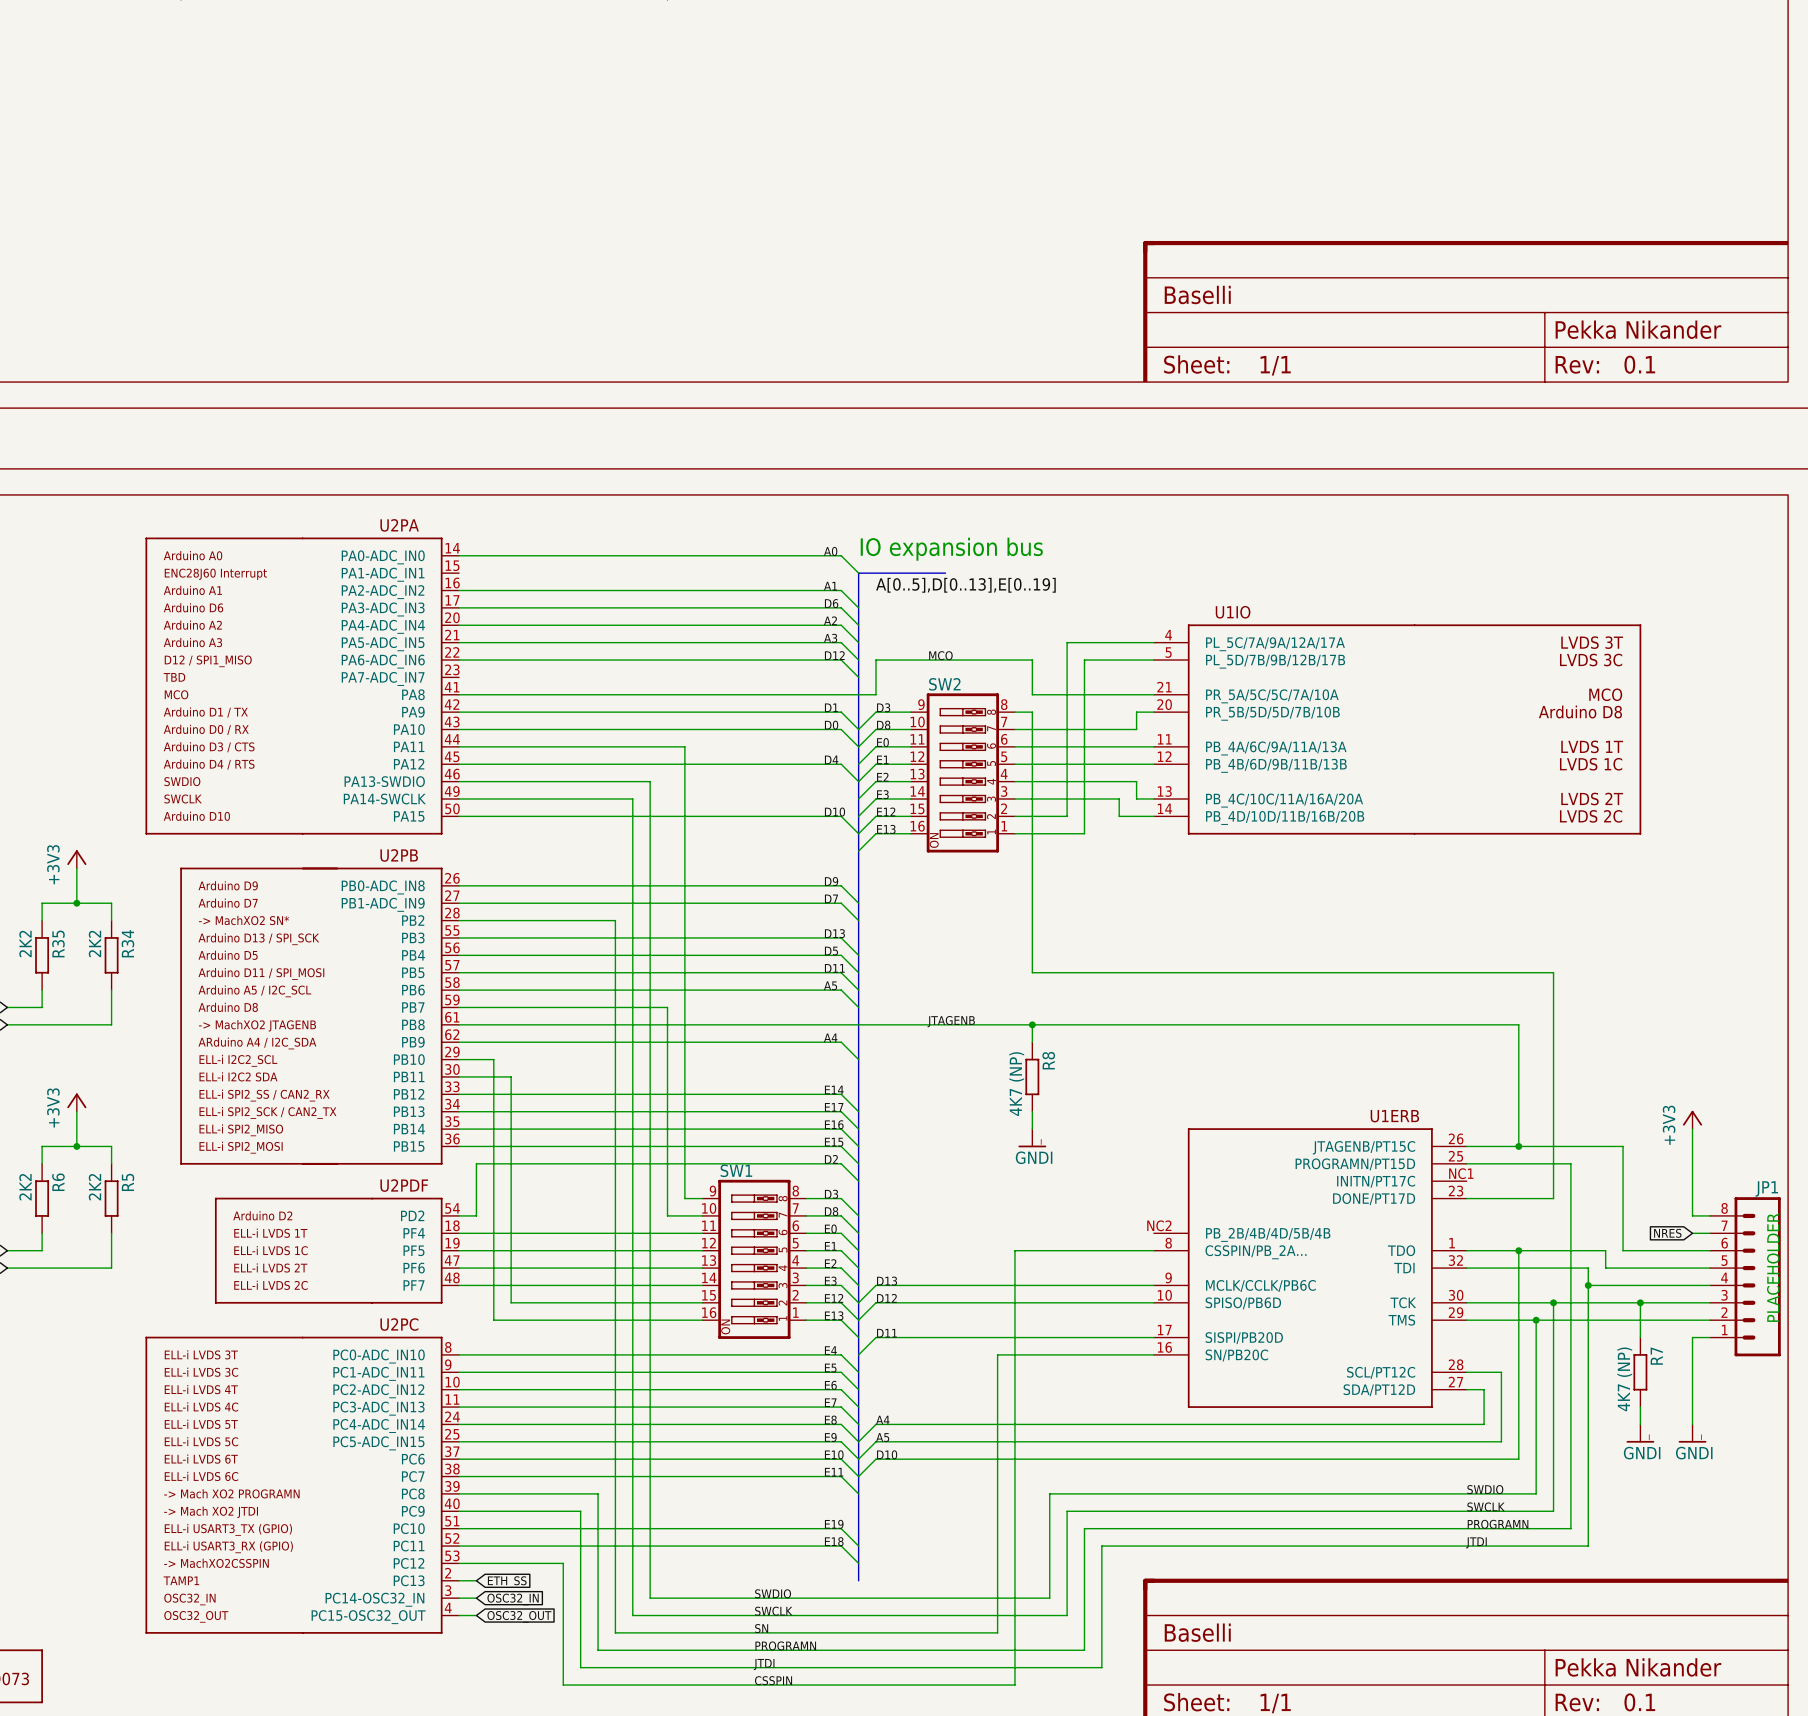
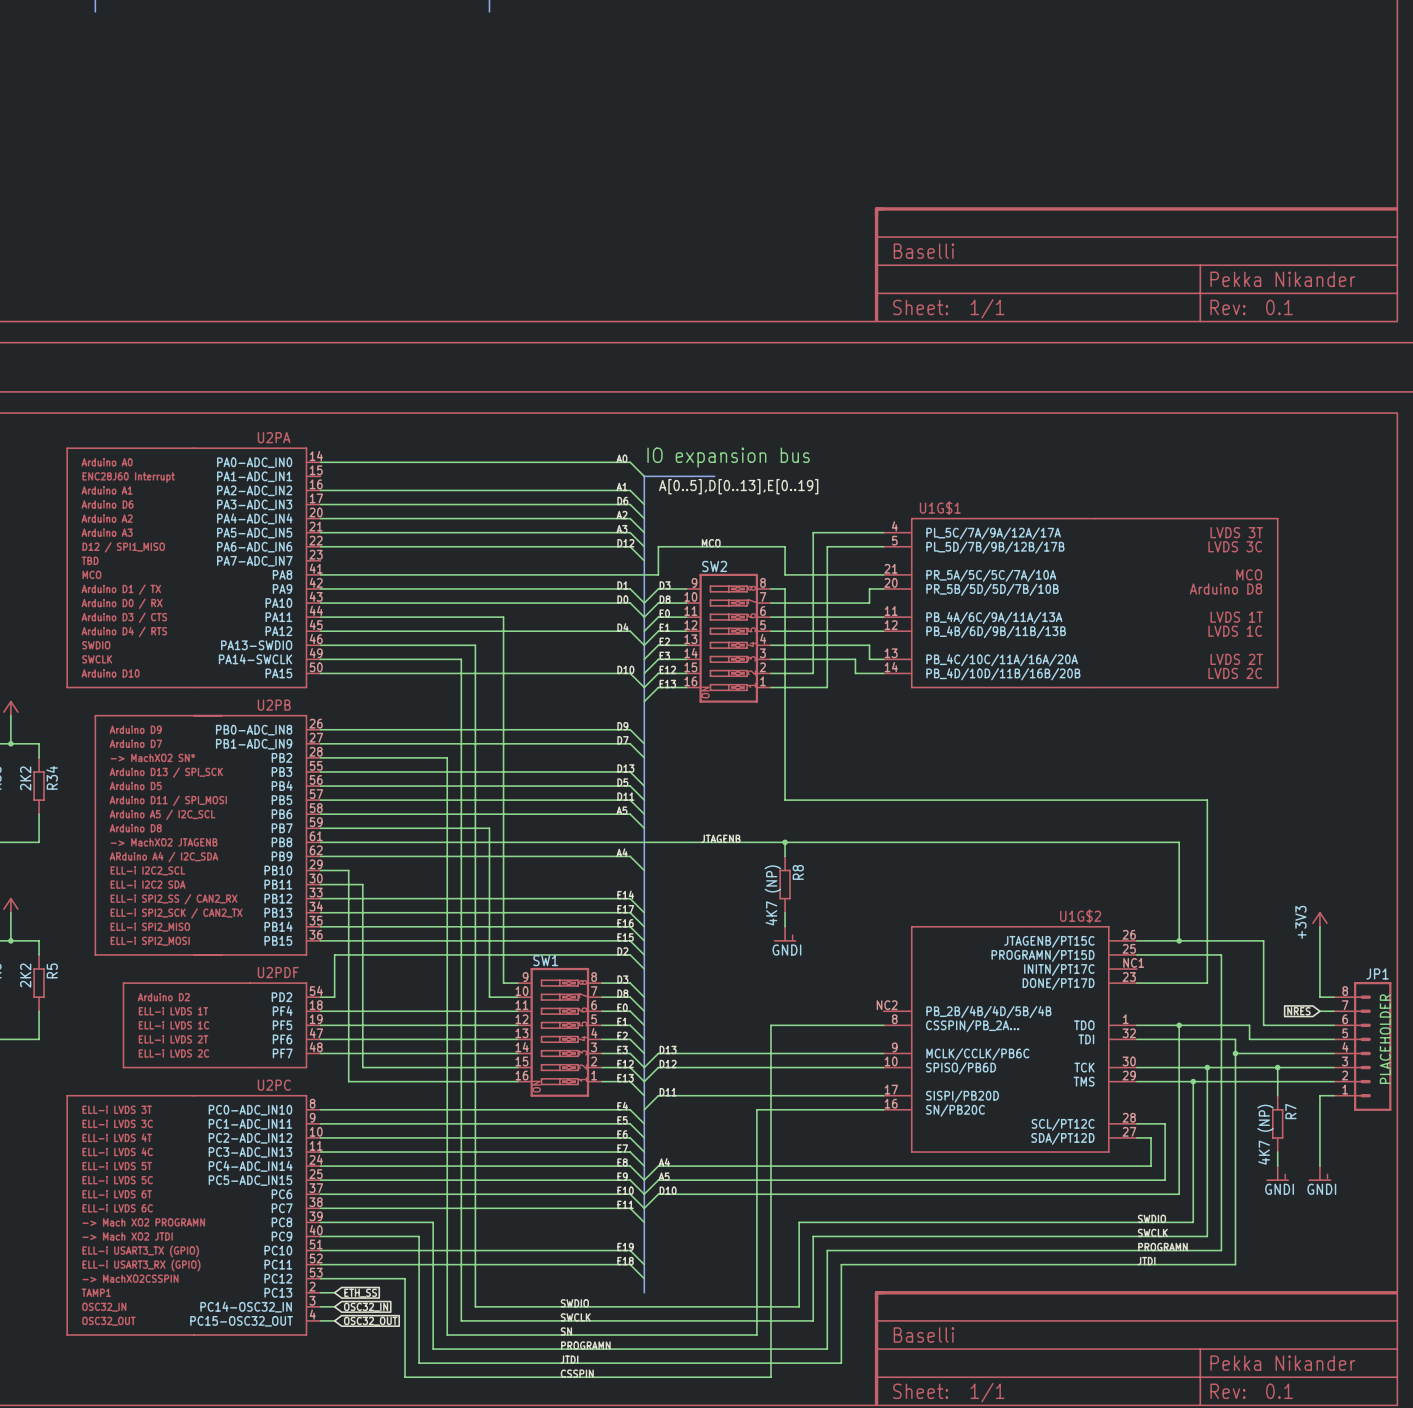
U1IO name: U1IO (1233, 612) -> U1G$1 (940, 508)
U1ERB name: U1ERB (1394, 1116) -> U1G$2 (1080, 916)

